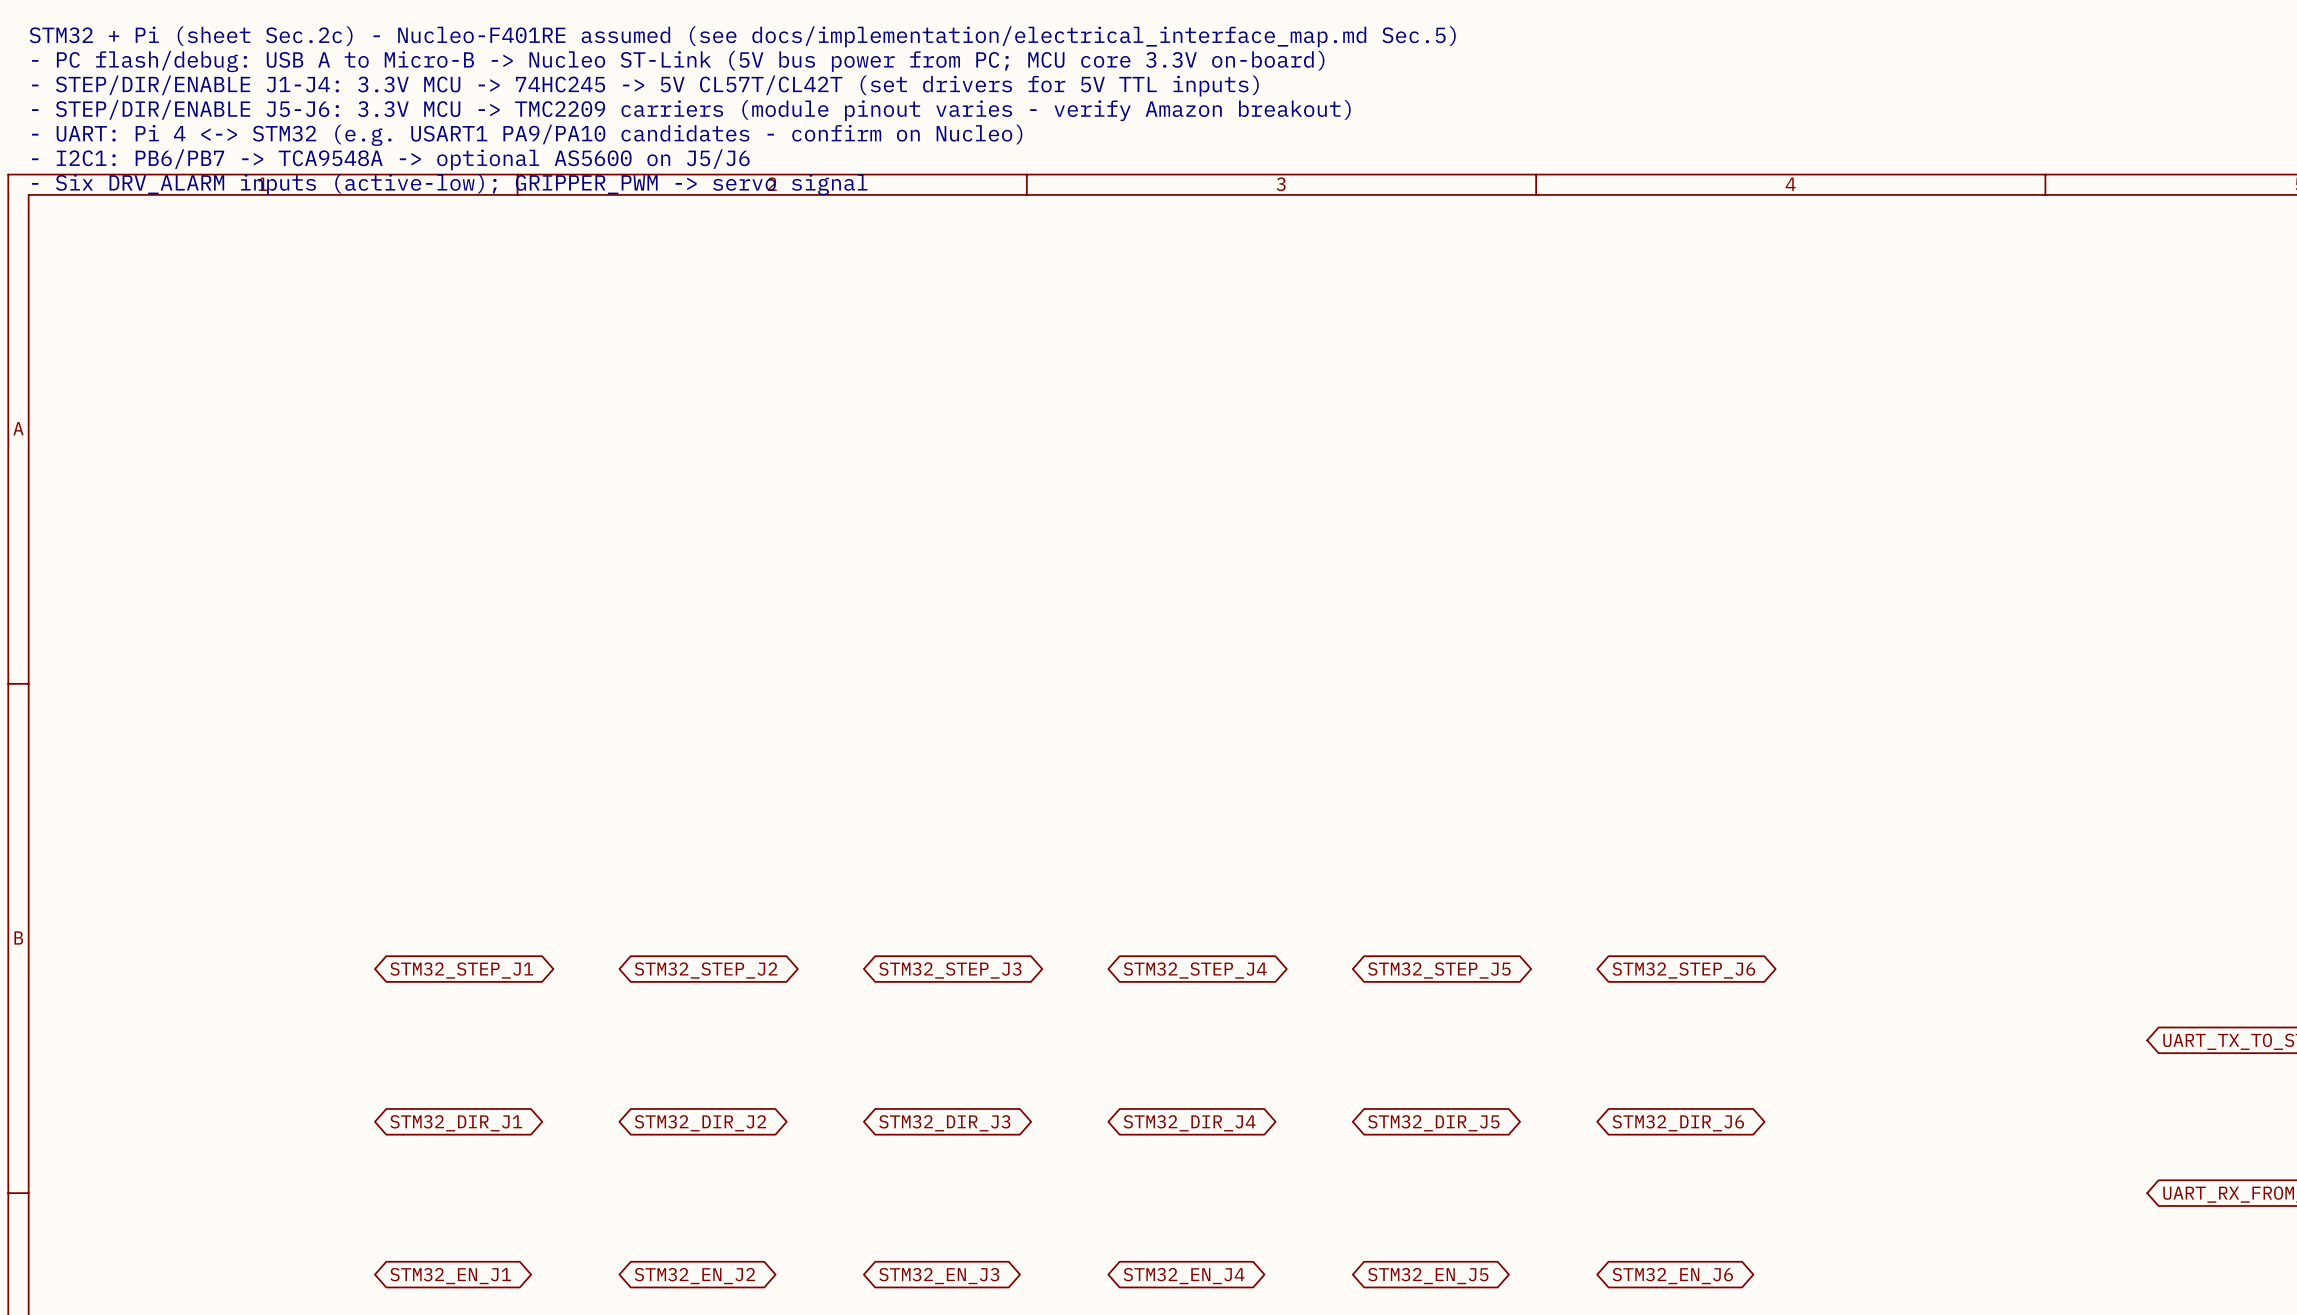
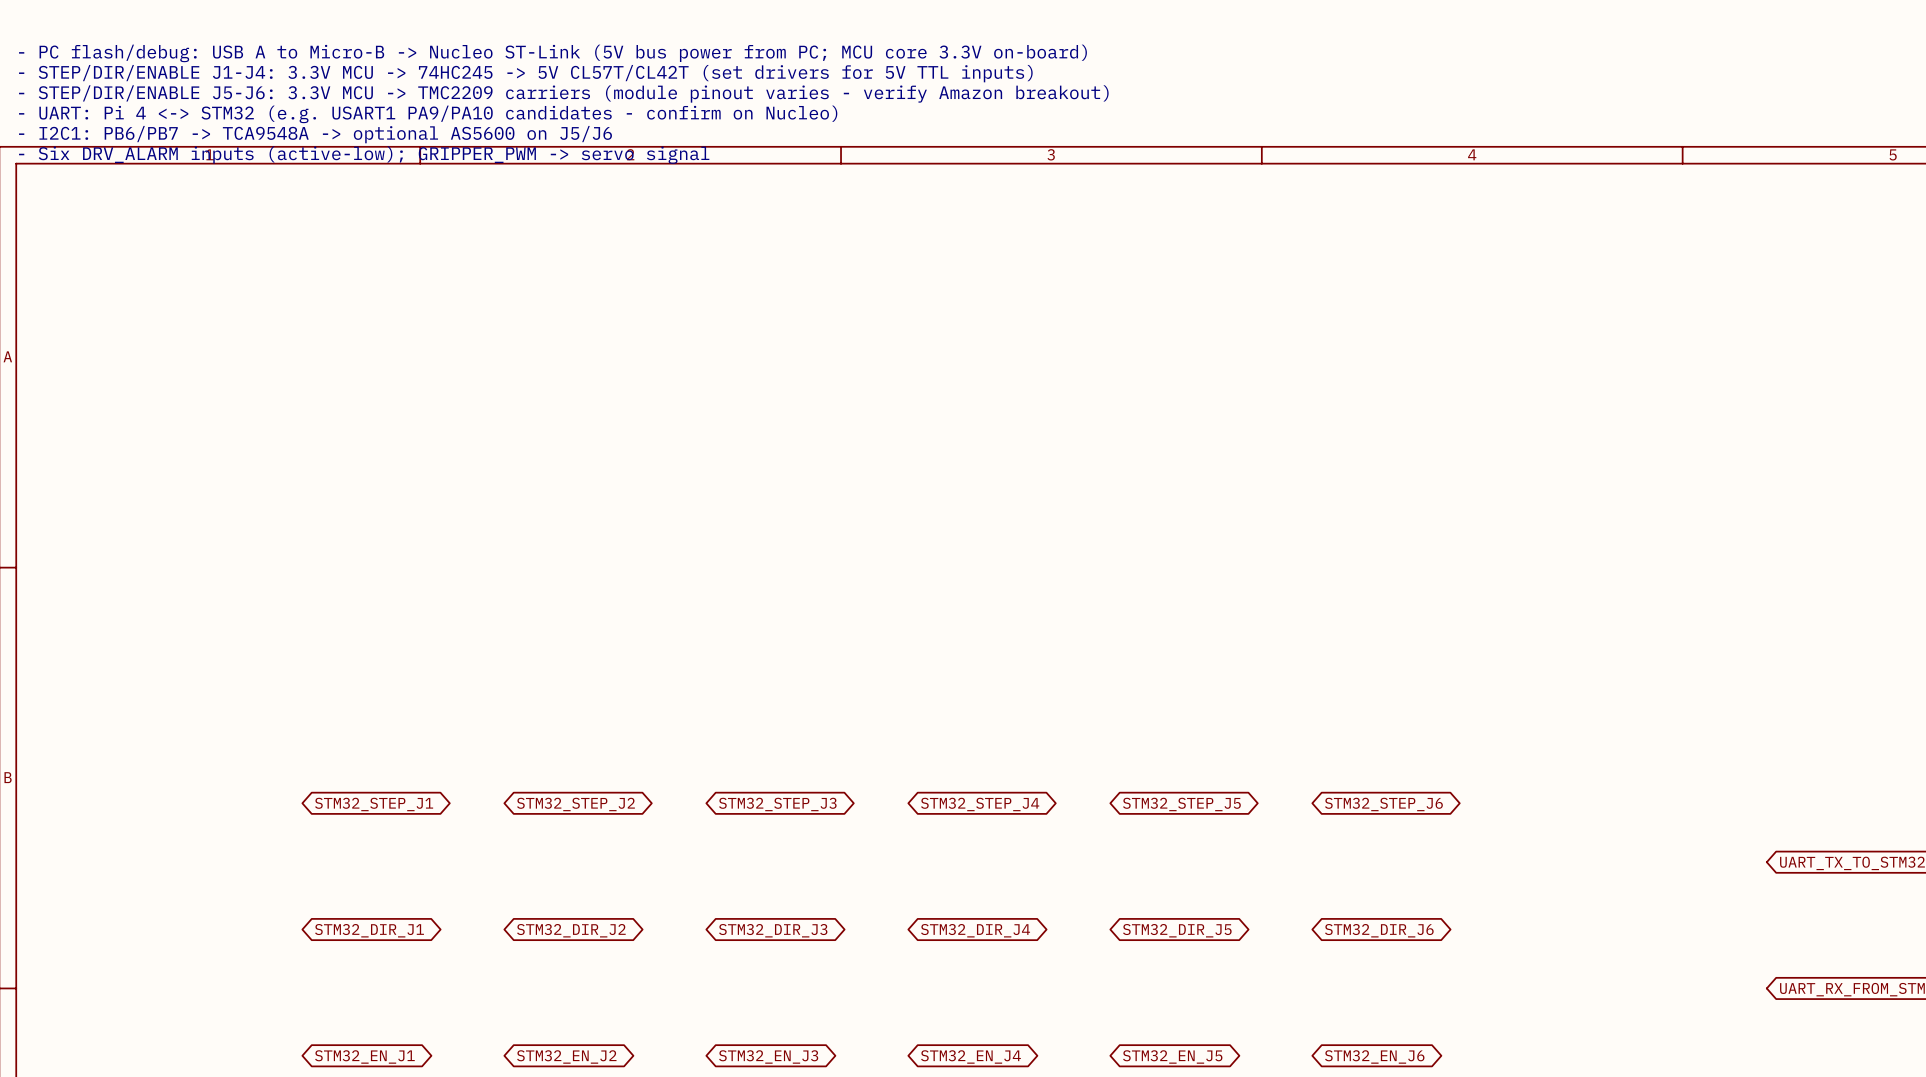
text: STM32 + Pi (sheet Sec.2c) - Nucleo-F401RE assumed (see docs/implementation/electrical_interface_map.md Sec.5) (742, 36) -> none

